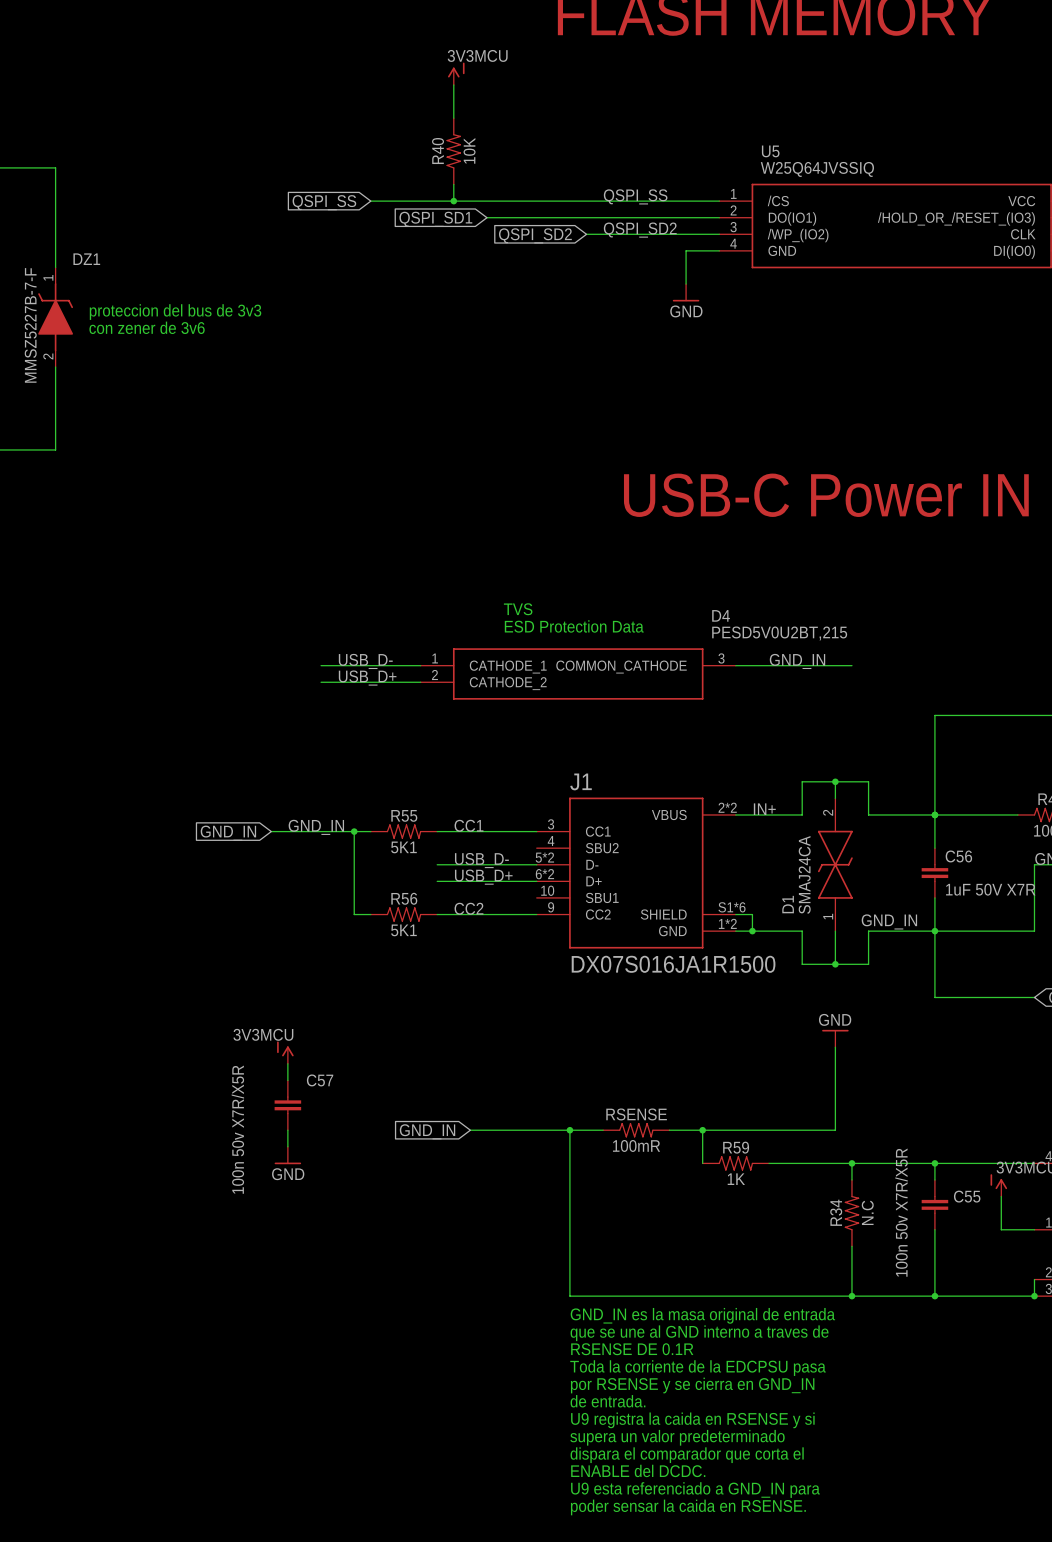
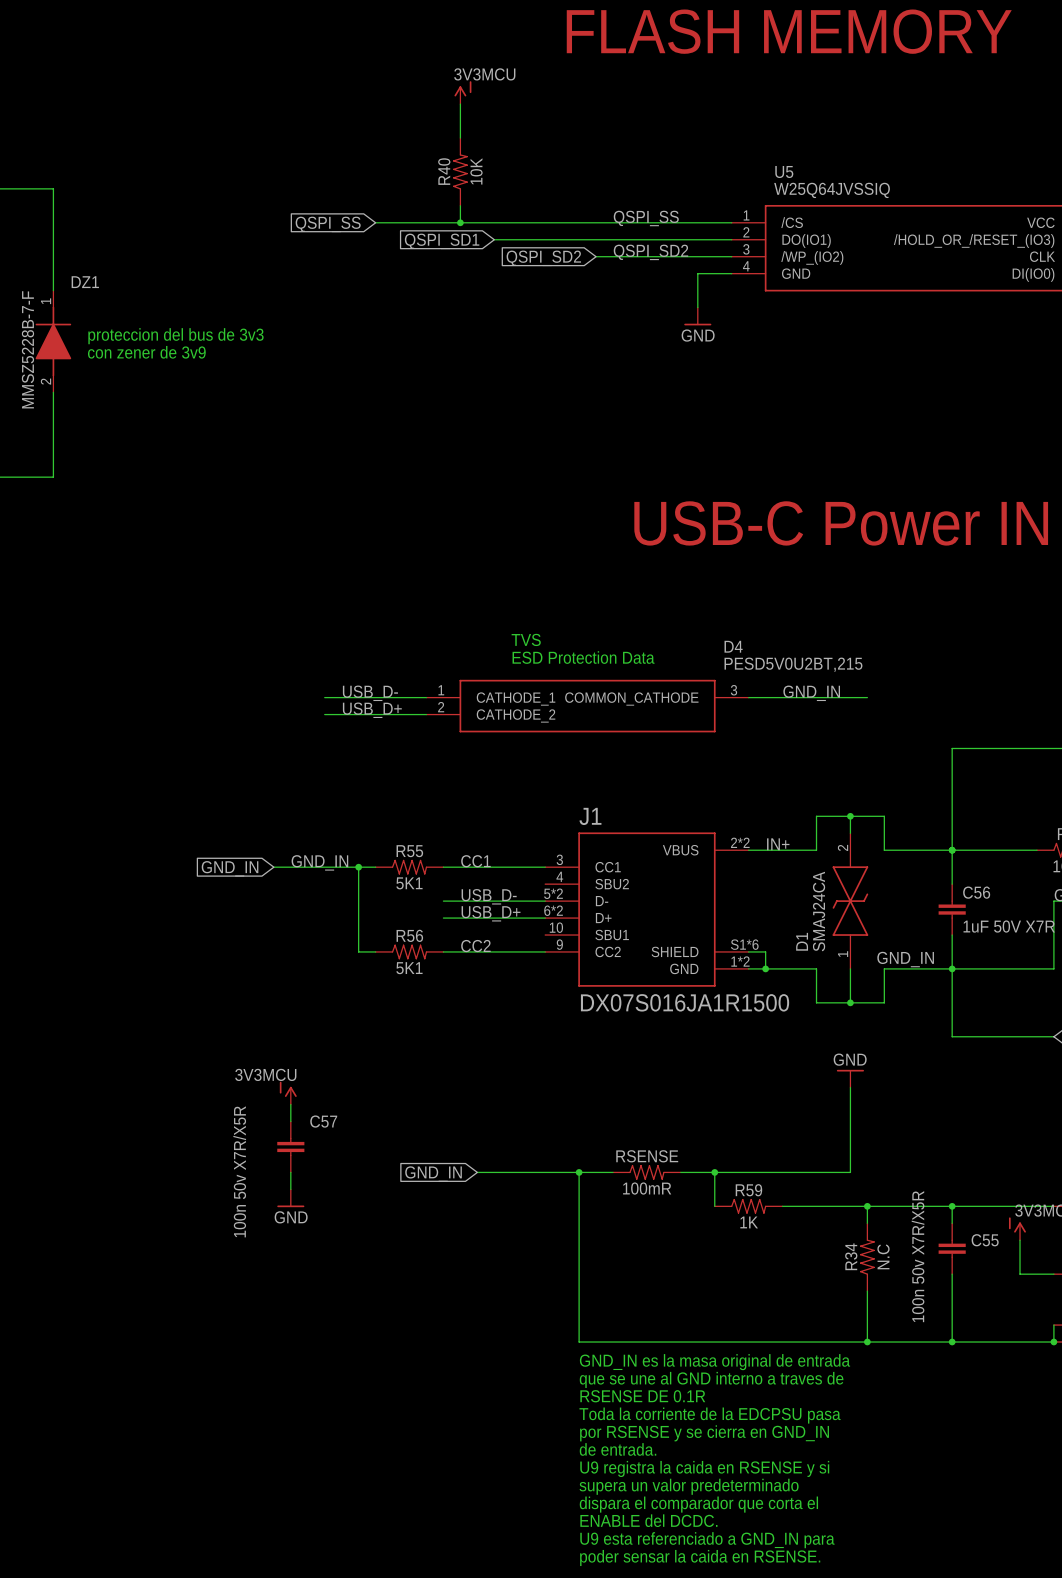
DZ1 symbol: [38, 267, 74, 368] -> [35, 290, 72, 393]
DZ1 value: MMSZ5227B-7-F (30, 325) -> MMSZ5228B-7-F (27, 349)
text: con zener de 3v6 (147, 327) -> con zener de 3v9 (146, 352)

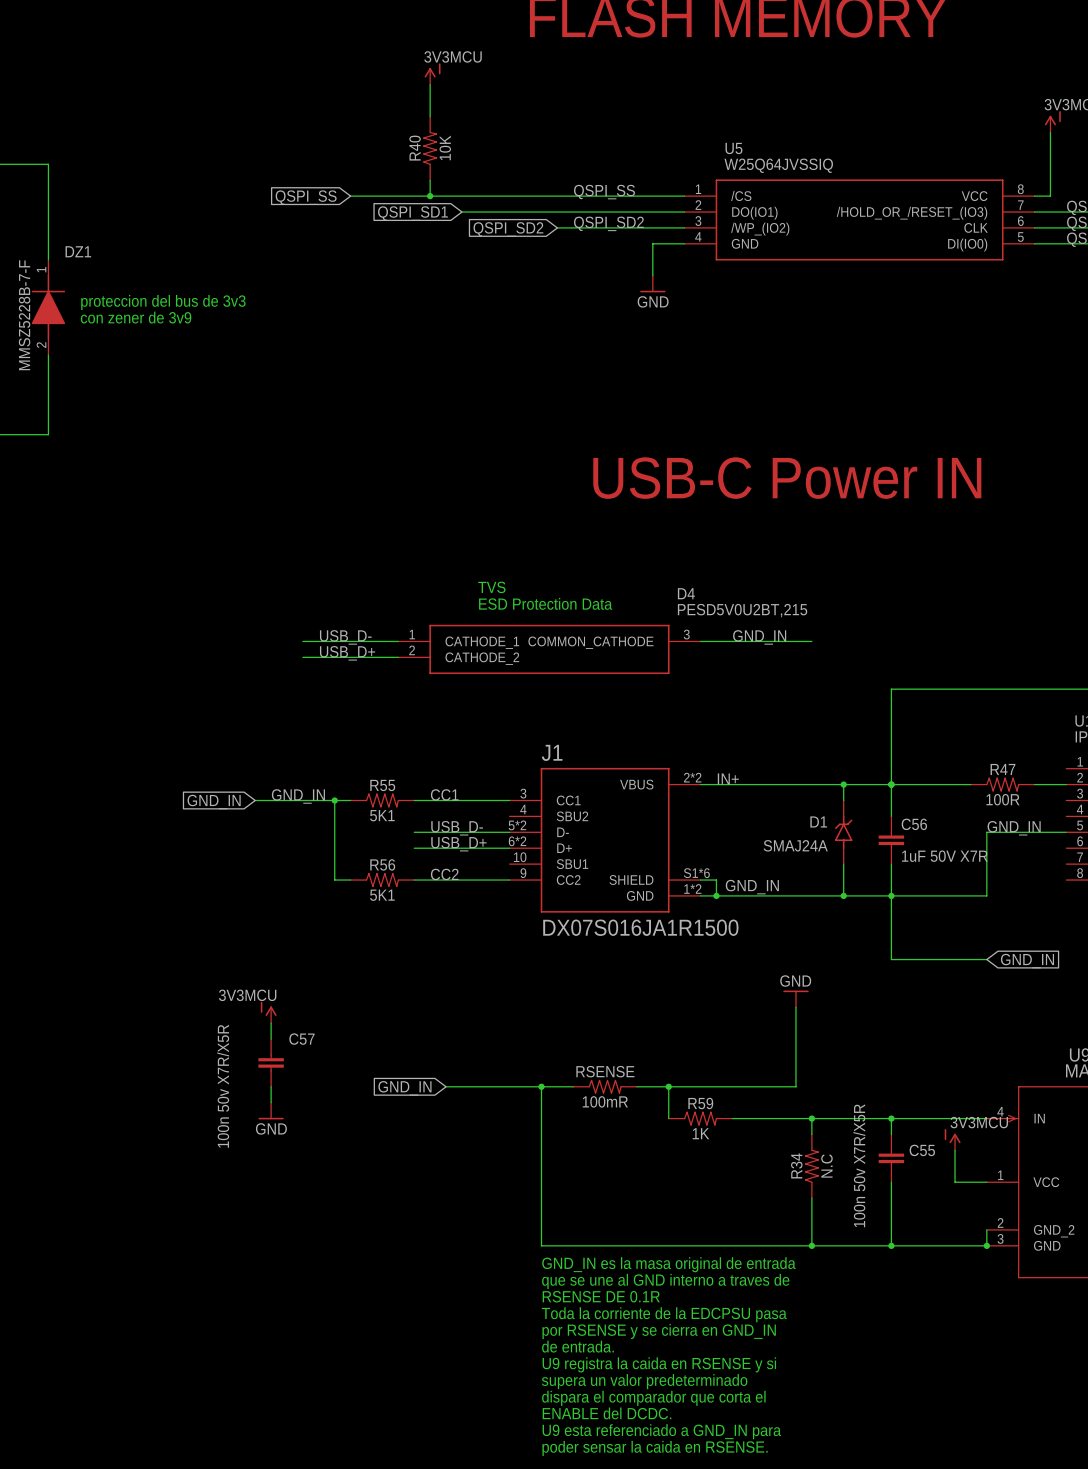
wire: (850, 816) (850, 833) -> (843, 784) (843, 800)
junction: (850, 816) -> none
D1 symbol: [832, 833, 869, 969] -> [834, 800, 853, 865]
wire: (816, 850) (816, 816) (884, 816) (884, 850) -> (764, 784) (827, 784)
junction: none -> (843, 784)
D1 value: SMAJ24CA (819, 911) -> SMAJ24A (795, 845)
D1 name position: D1 (802, 941) -> D1 (818, 821)
label position: GND_IN (905, 959) -> GND_IN (752, 887)
wire: (816, 968) (816, 1002) (884, 1002) (884, 968) -> (764, 895) (827, 895)
wire: (850, 968) (850, 1002) -> (843, 864) (843, 895)
junction: none -> (843, 895)
junction: (850, 1002) -> none

